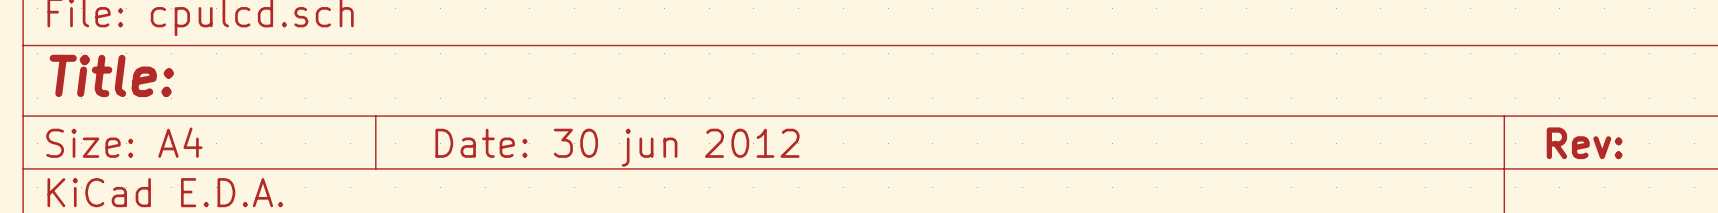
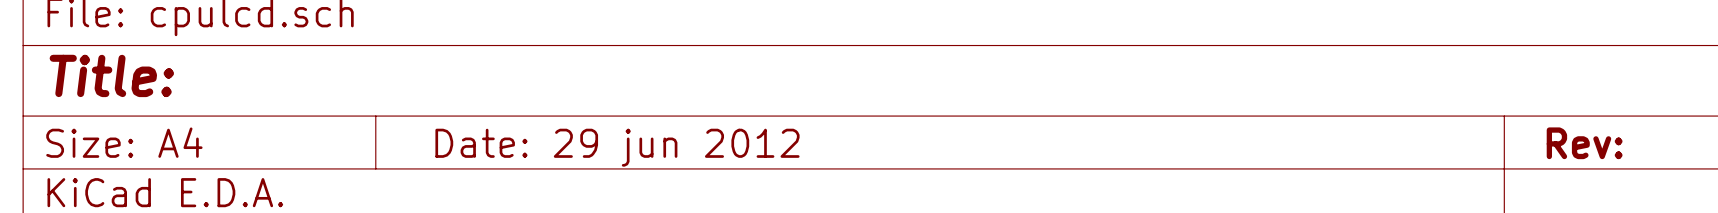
title block: Date: 30 jun 2012 (617, 147) -> Date: 29 jun 2012 (617, 147)

